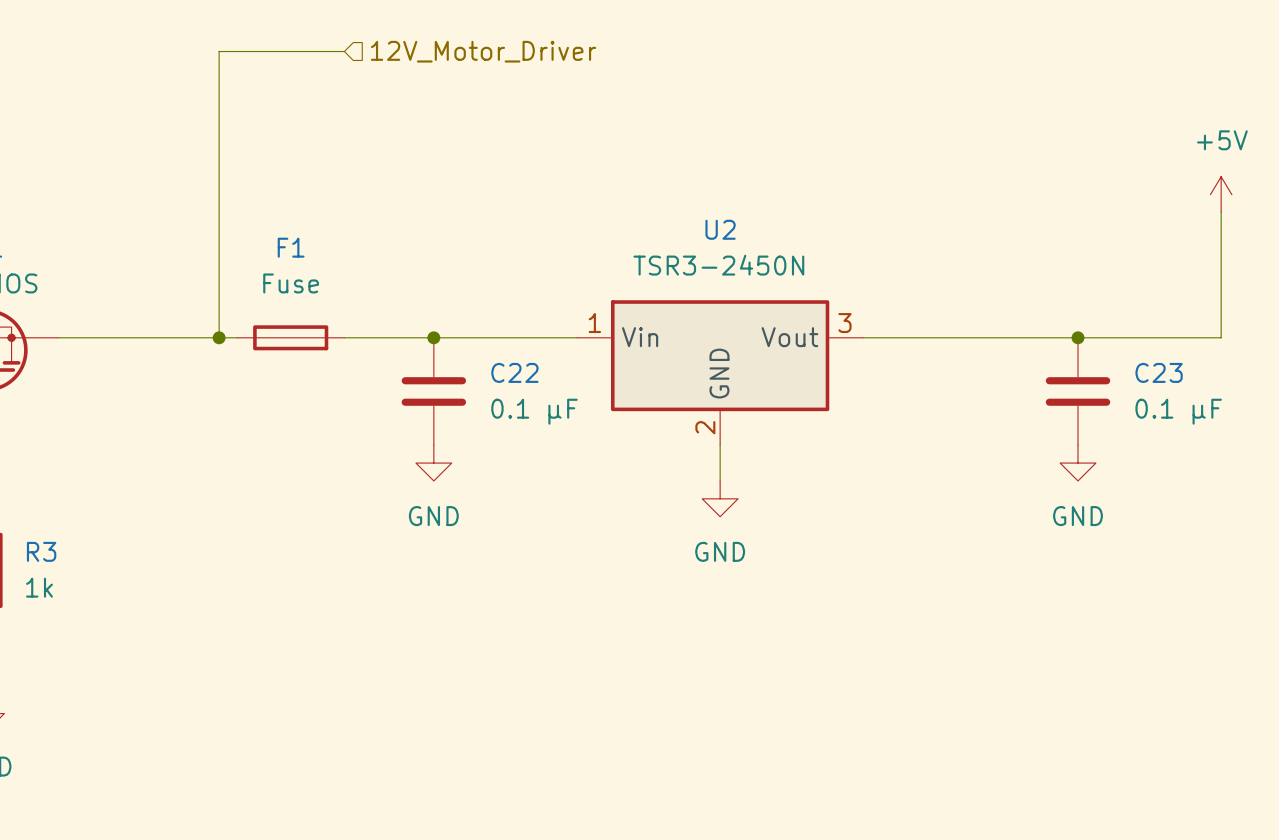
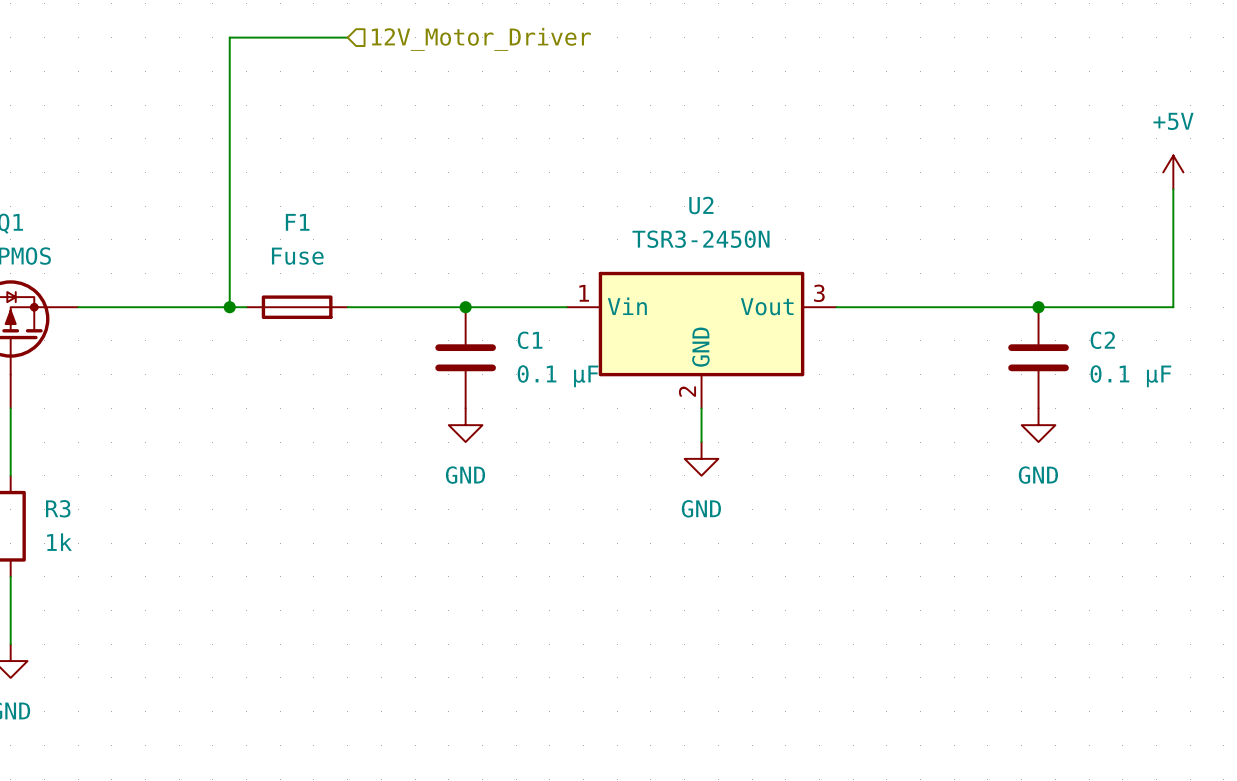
junction position: (433, 337) -> (465, 307)
C23 name: C23 (1159, 372) -> C2 (1102, 340)
C22: 0.1 µF (433, 391) -> none
C1: none -> 0.1 µF (465, 357)
power symbol position: GND (433, 463) -> GND (465, 425)

